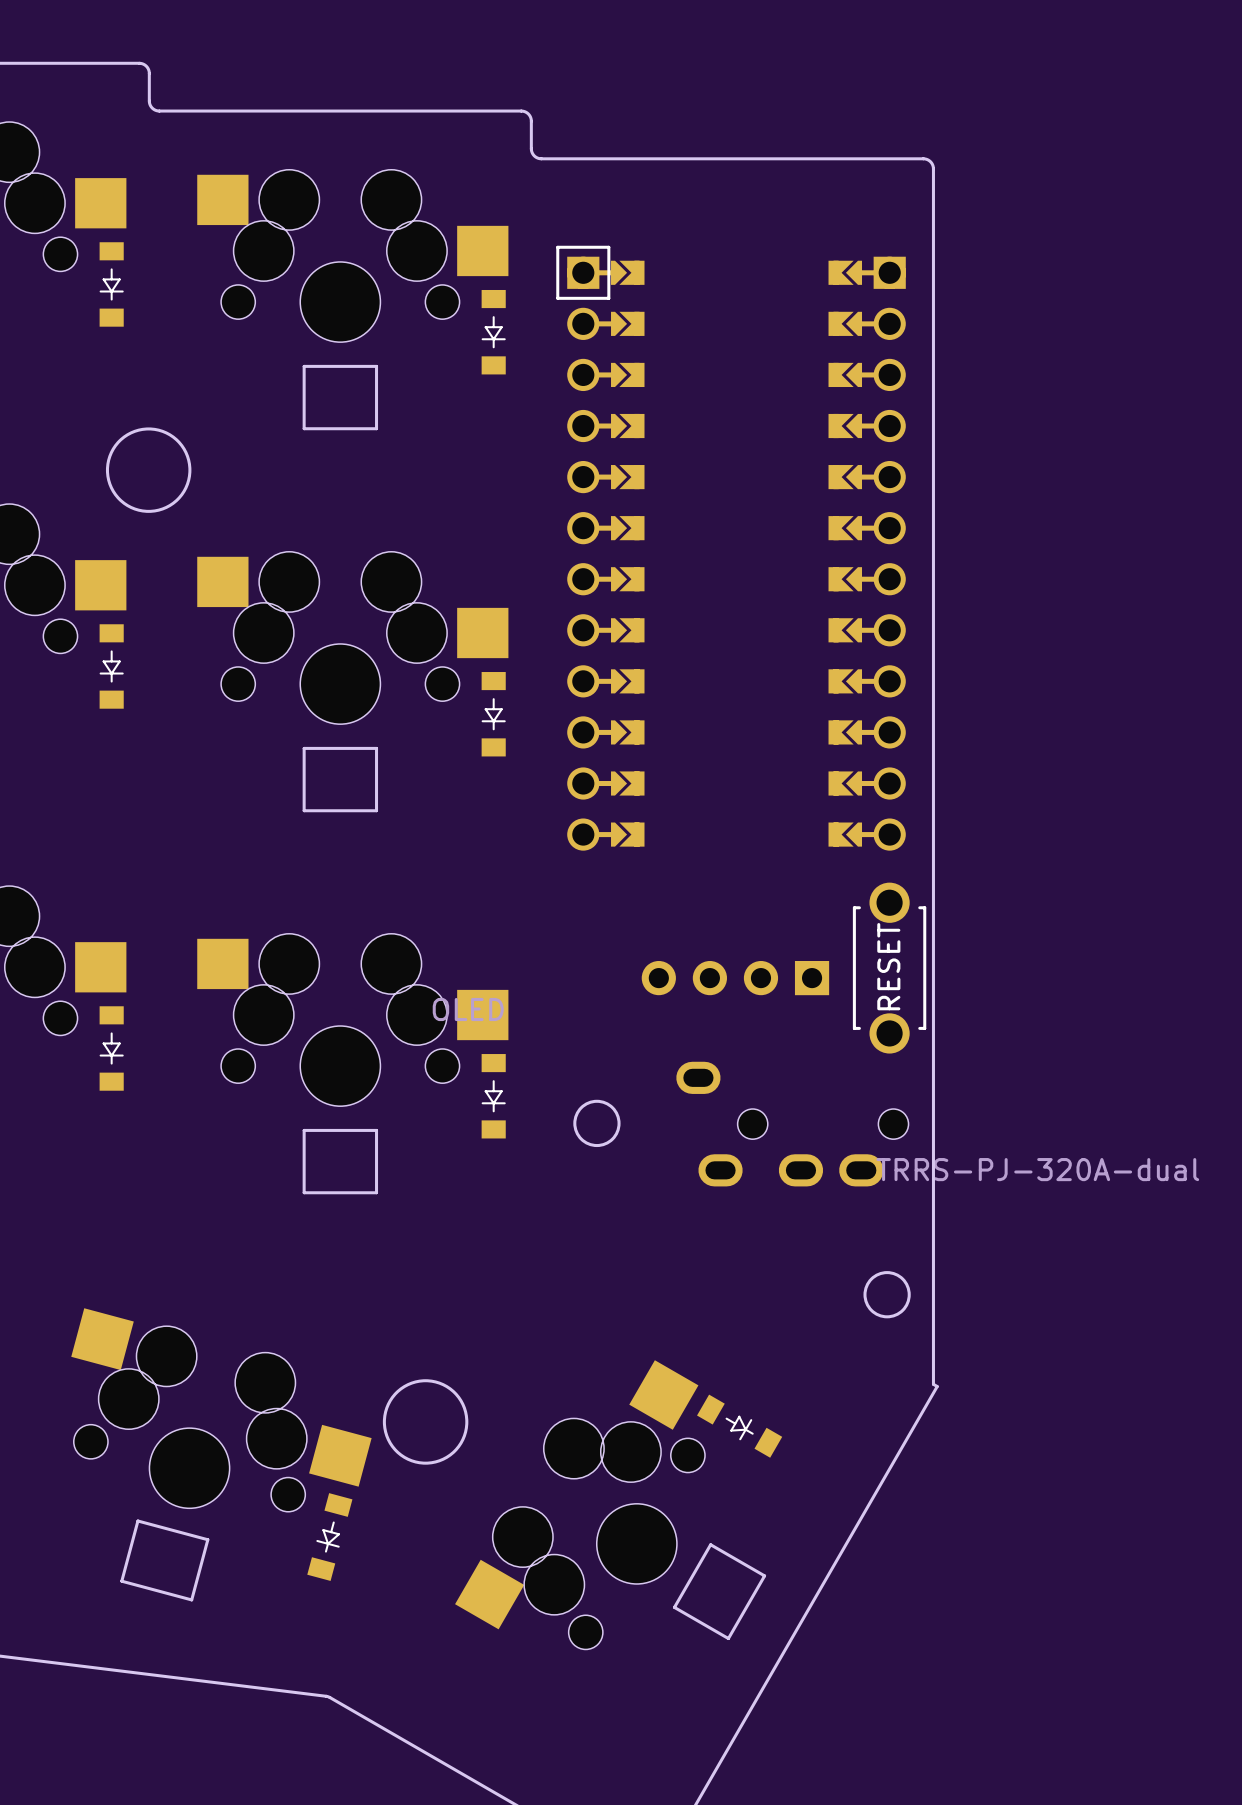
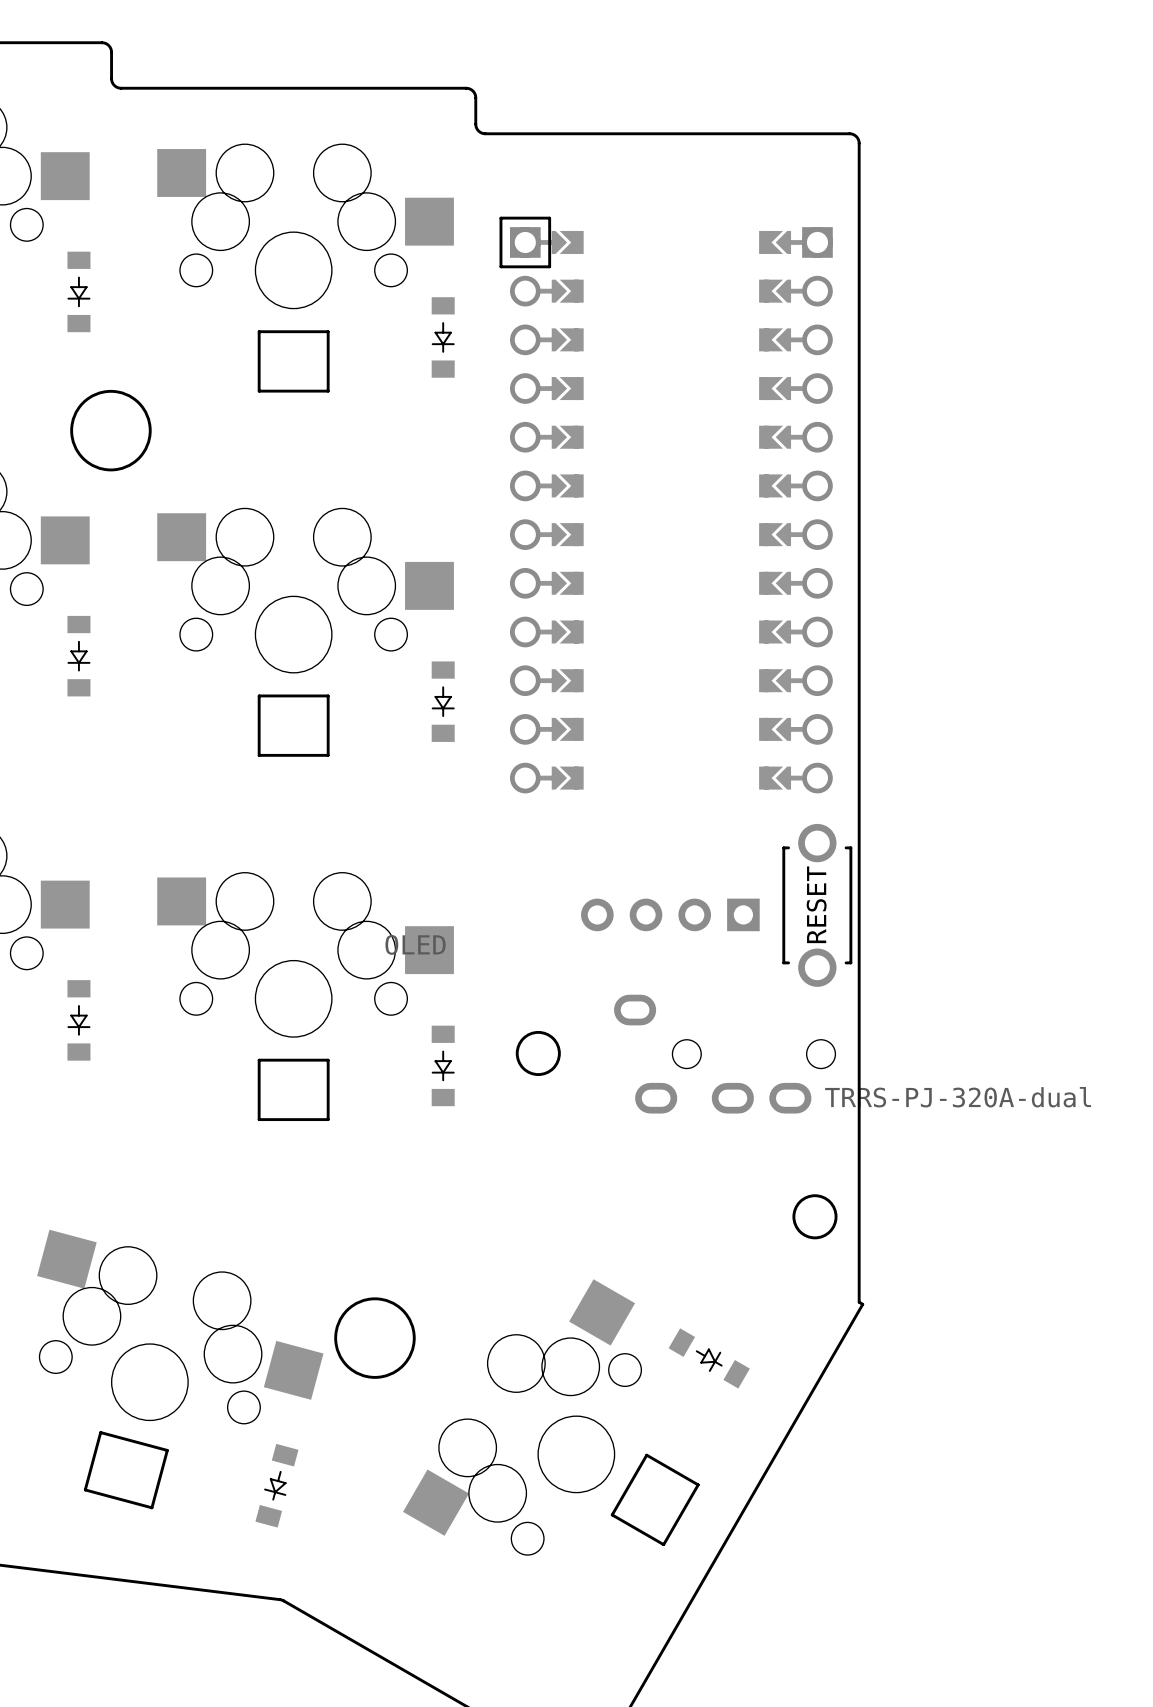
part position: (111, 284) -> (78, 291)
part position: (493, 332) -> (443, 337)
part position: (111, 666) -> (78, 656)
part position: (493, 714) -> (443, 701)
part position: (111, 1048) -> (78, 1020)
part position: (493, 1096) -> (443, 1065)
part position: (739, 1426) -> (709, 1358)
part position: (329, 1537) -> (276, 1485)

